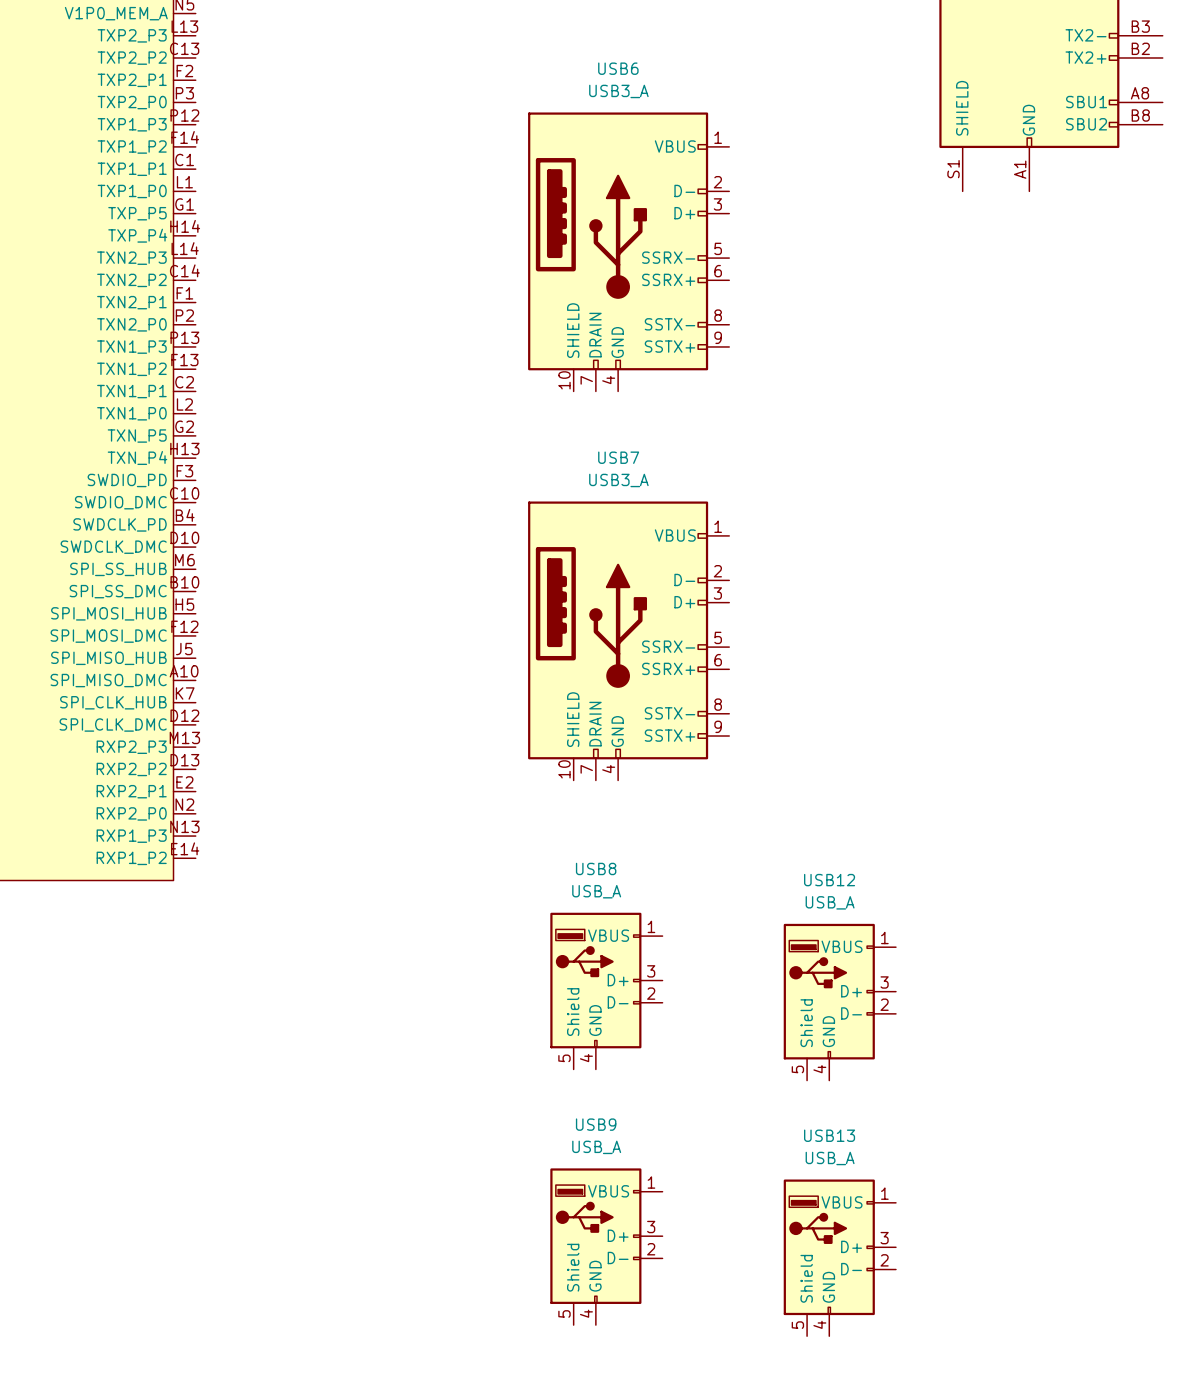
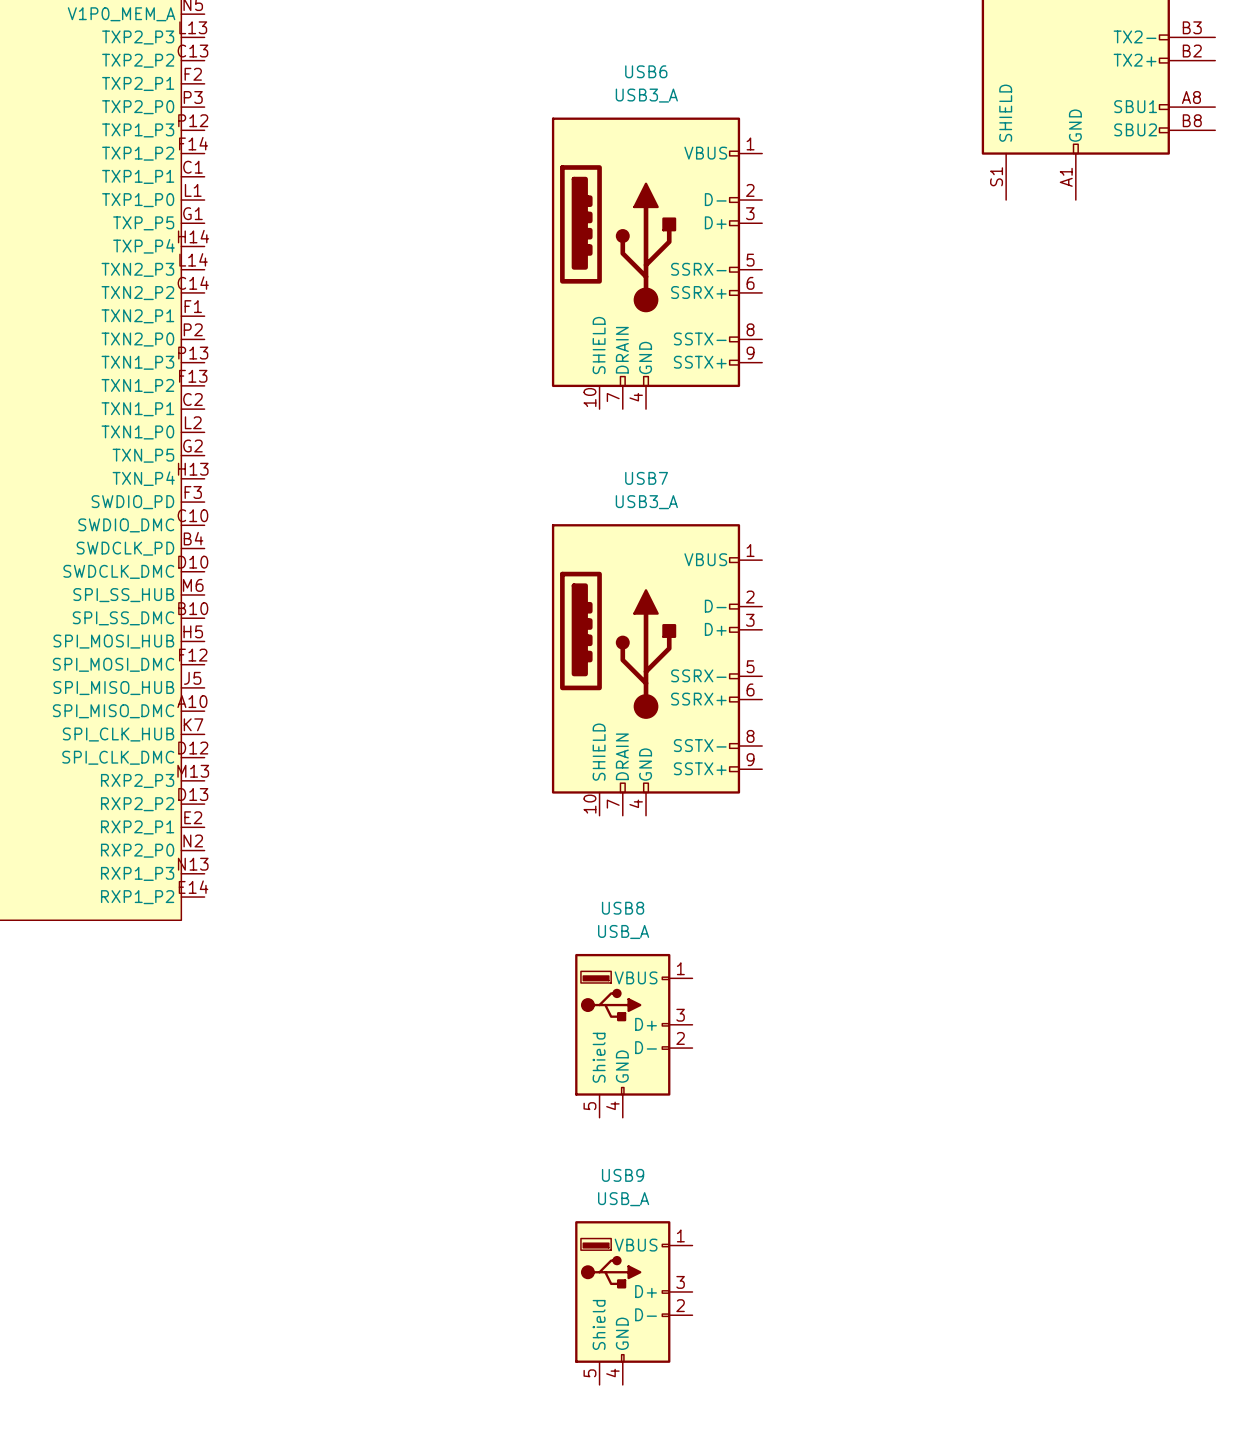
USB12: USB_A (839, 1002) -> none
USB13: USB_A (839, 1257) -> none

